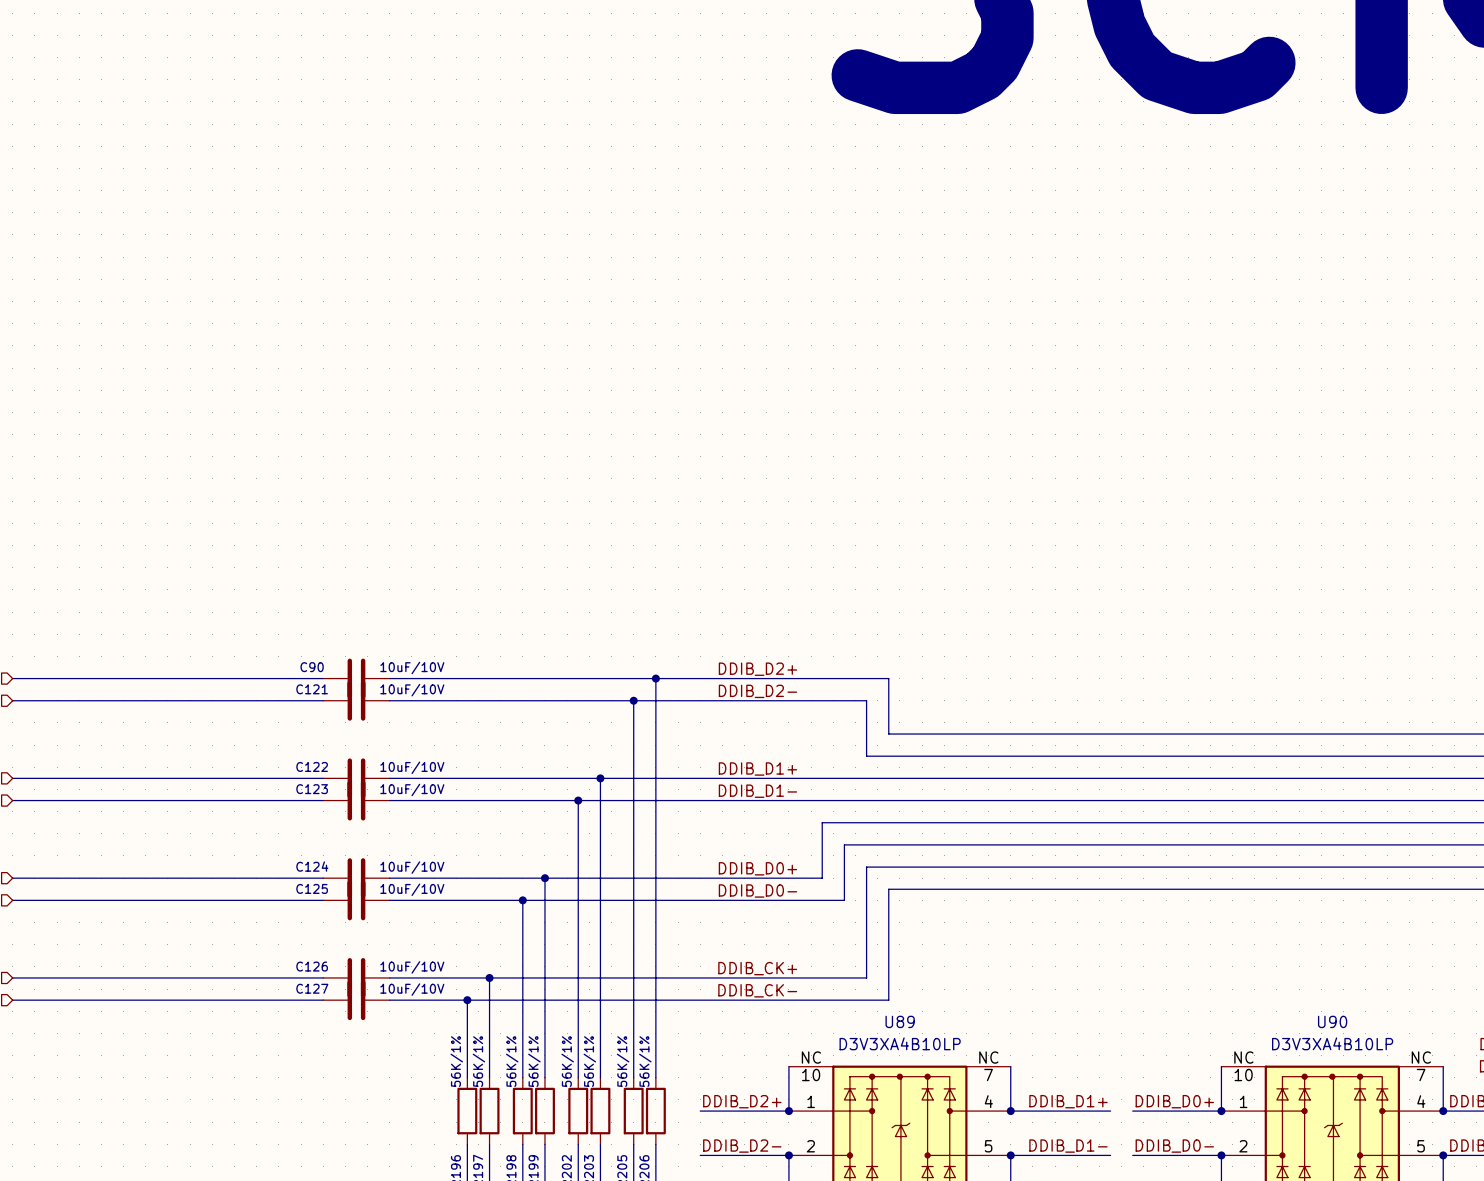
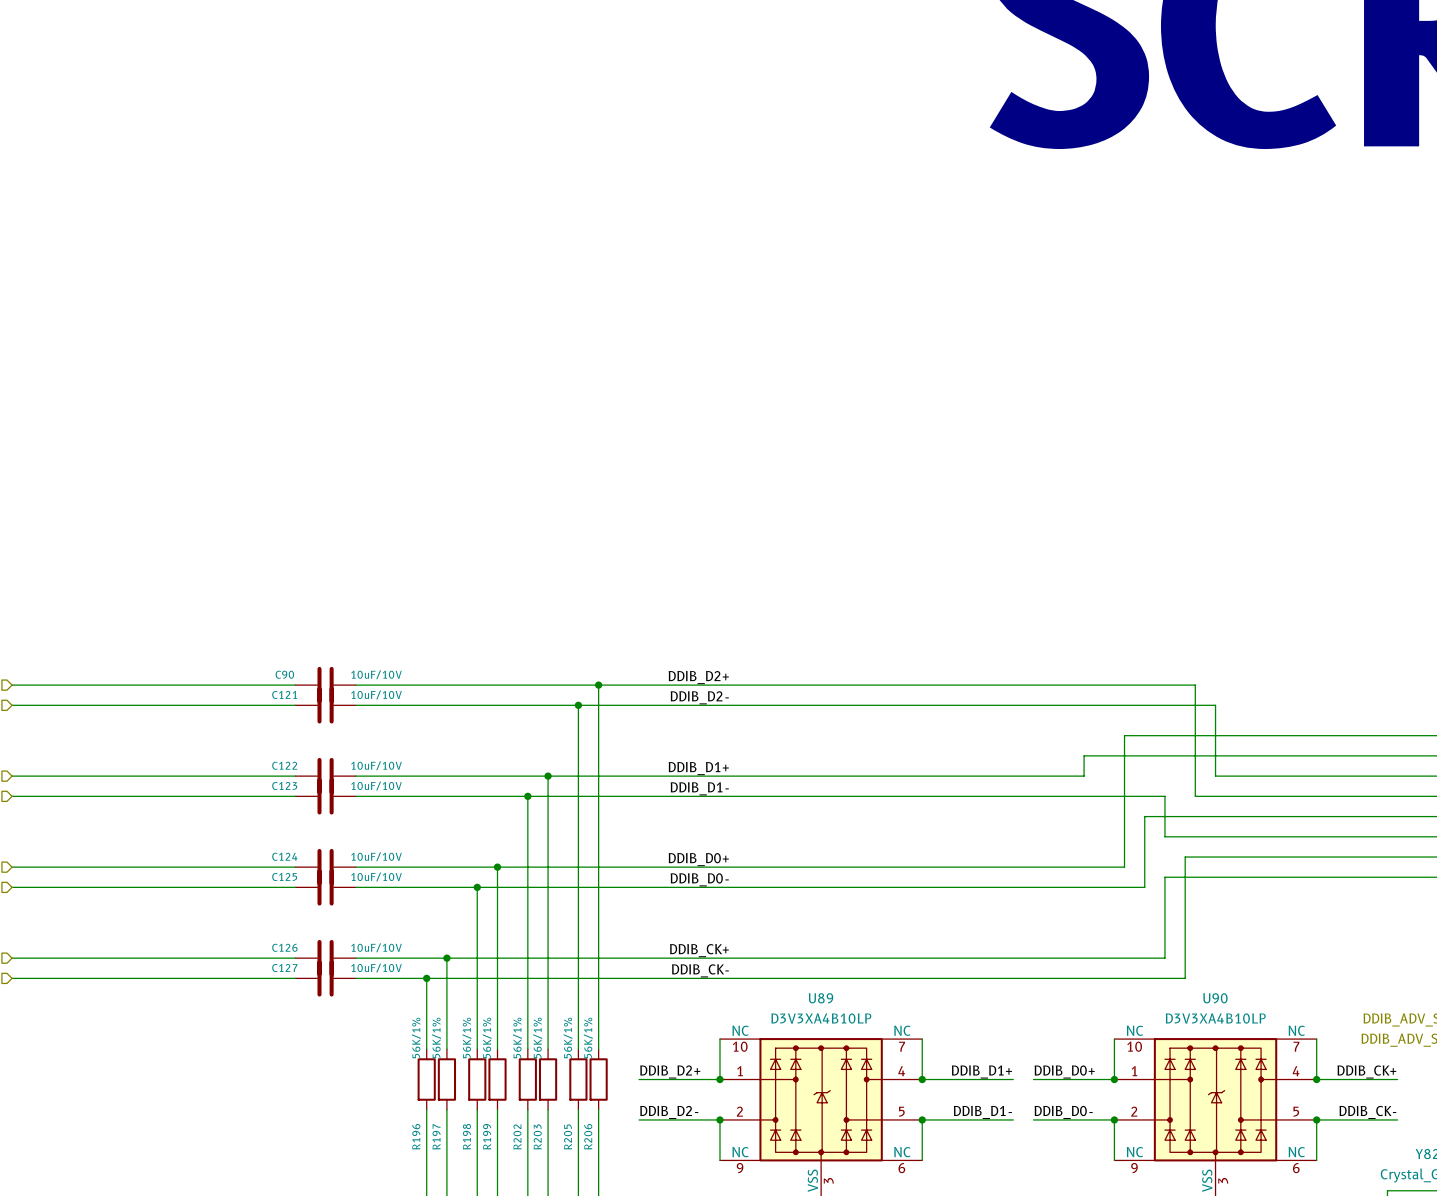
wire: (888, 678) (888, 734) (1232, 734) -> (811, 685) (1195, 685) (1195, 796)
wire: (866, 700) (866, 756) (1188, 756) -> (790, 705) (1215, 705) (1215, 776)
wire: none -> (1124, 735) (1124, 867) (750, 867)
wire: (1188, 778) (1332, 778) -> (1084, 776) (1084, 755)
wire: (1276, 800) (1310, 800) -> (1164, 796) (1164, 836)
wire: (1254, 822) (822, 822) (822, 878) -> (1144, 816) (1144, 887) (770, 887)
wire: (1276, 844) (844, 844) (844, 900) -> none
wire: (1299, 867) (866, 867) (866, 977) -> (1185, 857) (1185, 978) (811, 978)
wire: (1276, 889) (888, 889) (888, 1000) -> (1164, 877) (1164, 958) (790, 958)

